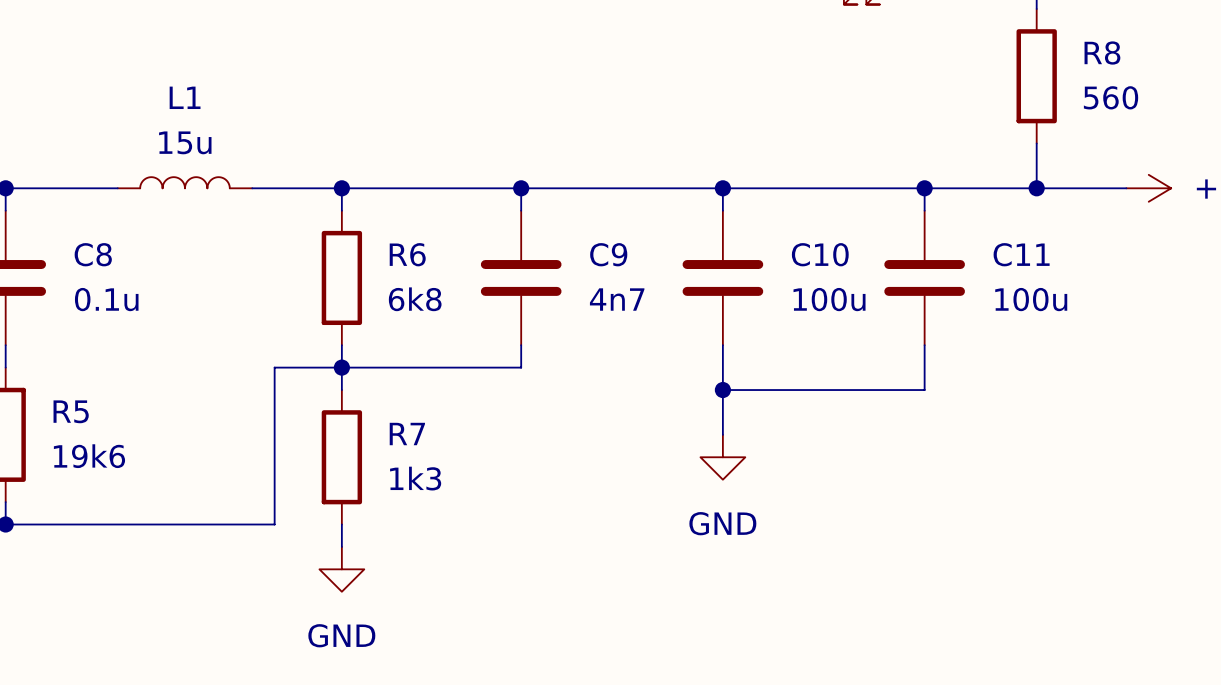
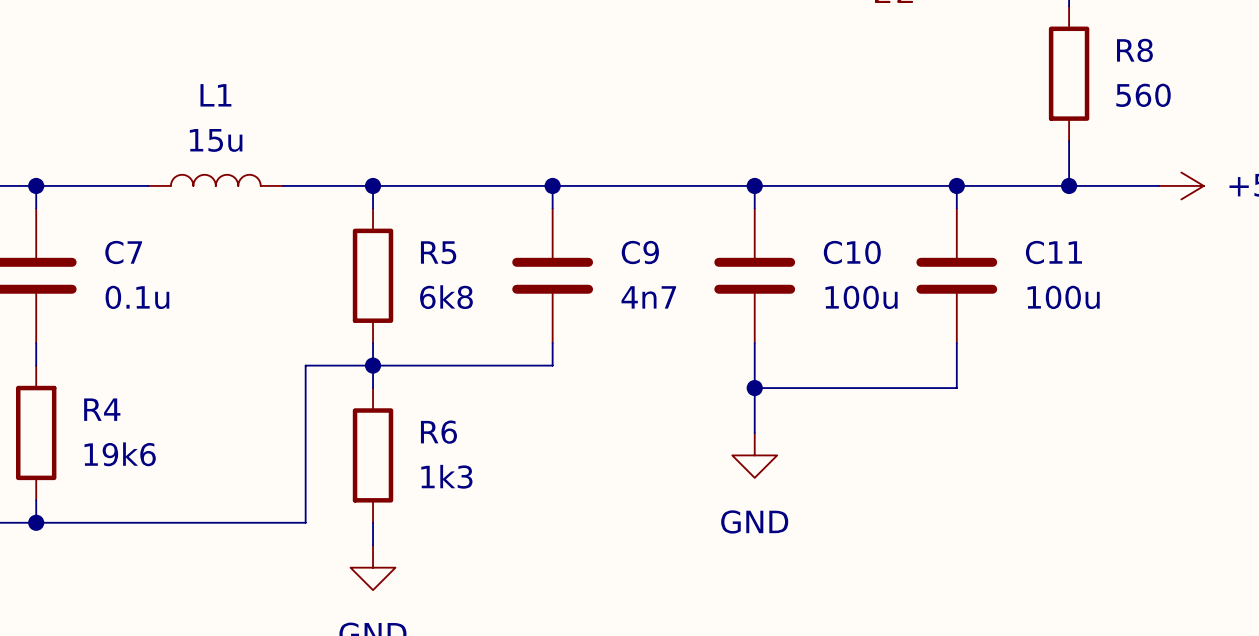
C8 name: C8 (93, 254) -> C7 (123, 252)
R6 name: R6 (407, 254) -> R5 (438, 252)
R5 name: R5 (71, 411) -> R4 (102, 409)
R7 name: R7 (407, 434) -> R6 (438, 432)

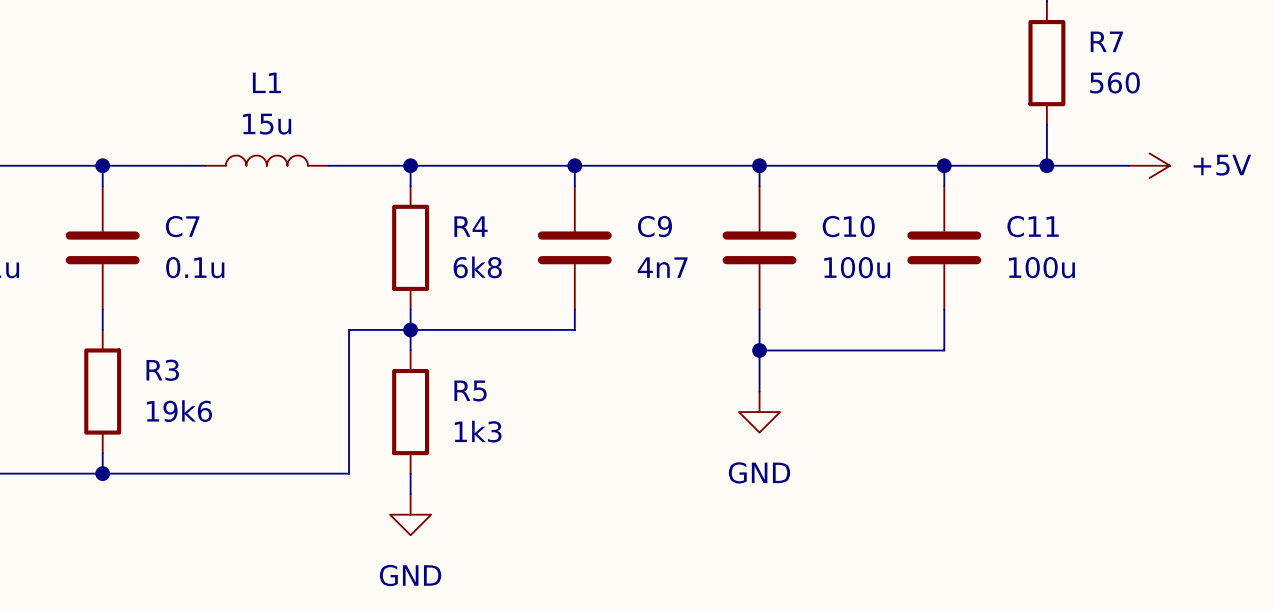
R8 name: R8 (1134, 50) -> R7 (1106, 41)
R5 name: R5 (438, 252) -> R4 (470, 226)
R4 name: R4 (102, 409) -> R3 (162, 370)
R6 name: R6 (438, 432) -> R5 (470, 390)

